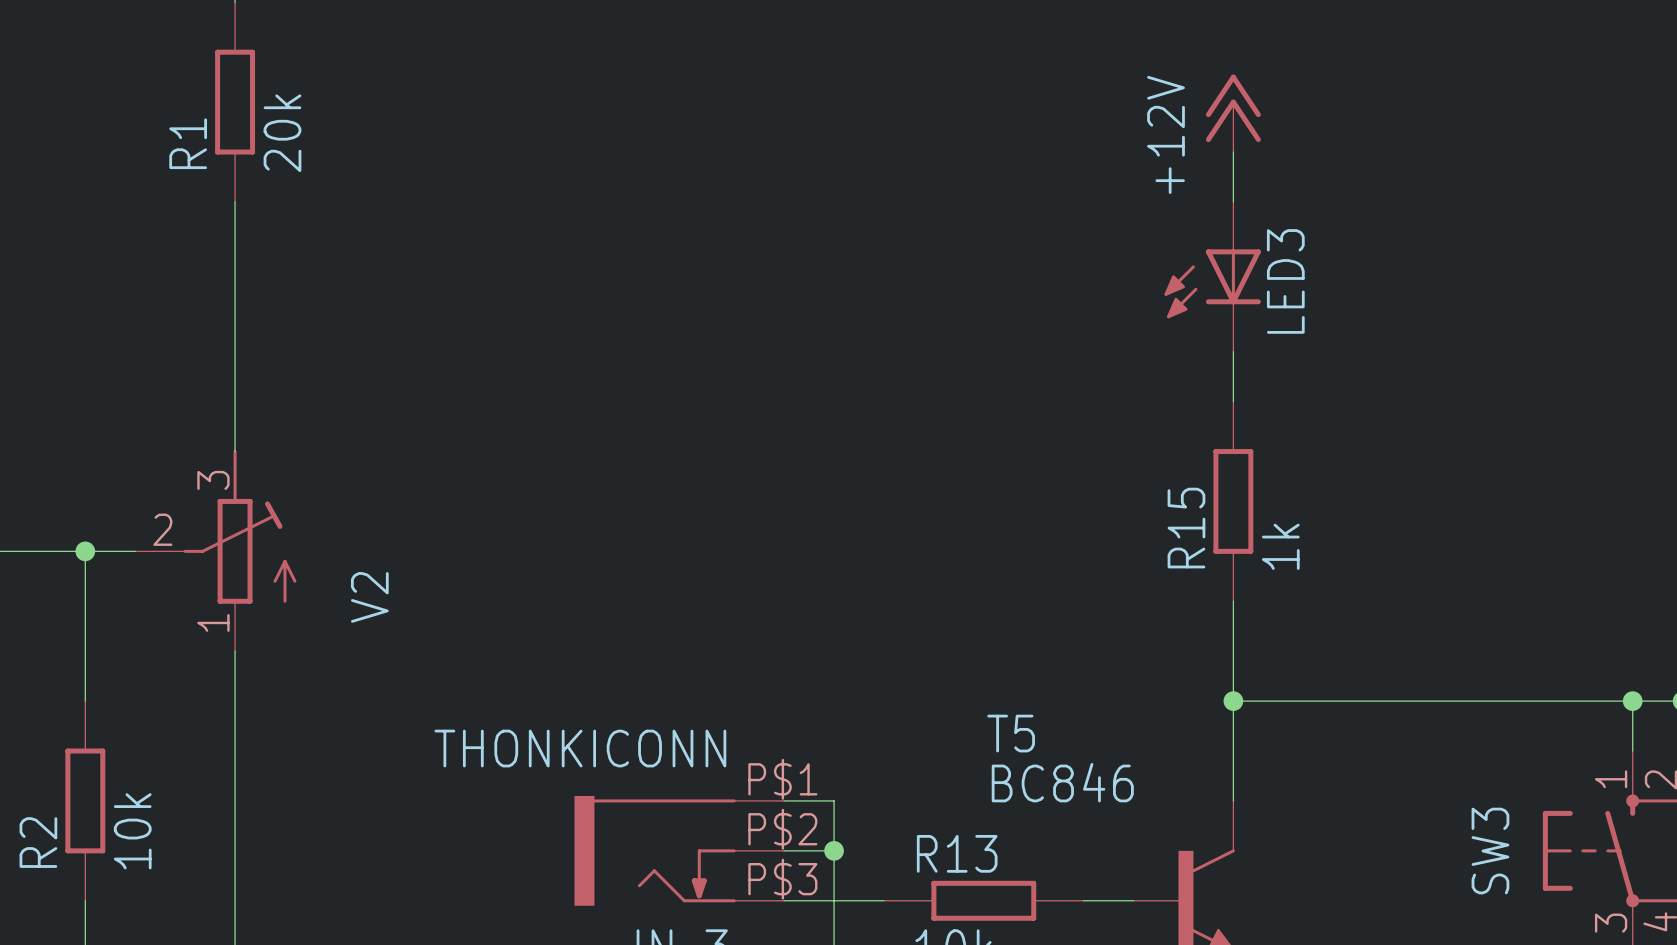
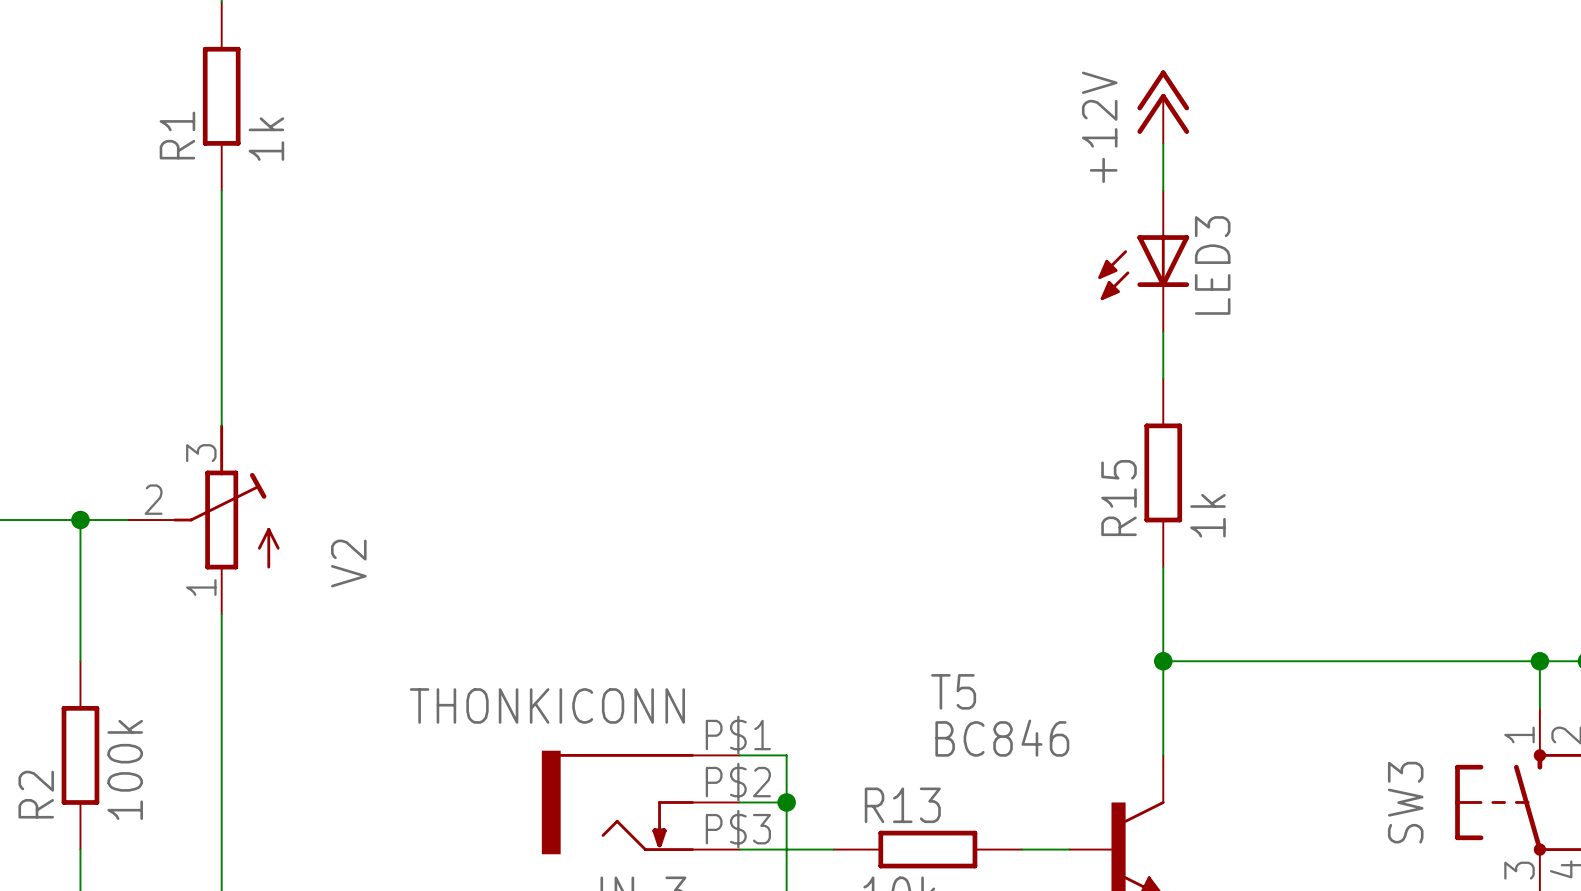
R1 value: 20k (282, 133) -> 1k (266, 139)
R2 value: 10k (132, 831) -> 100k (125, 769)

